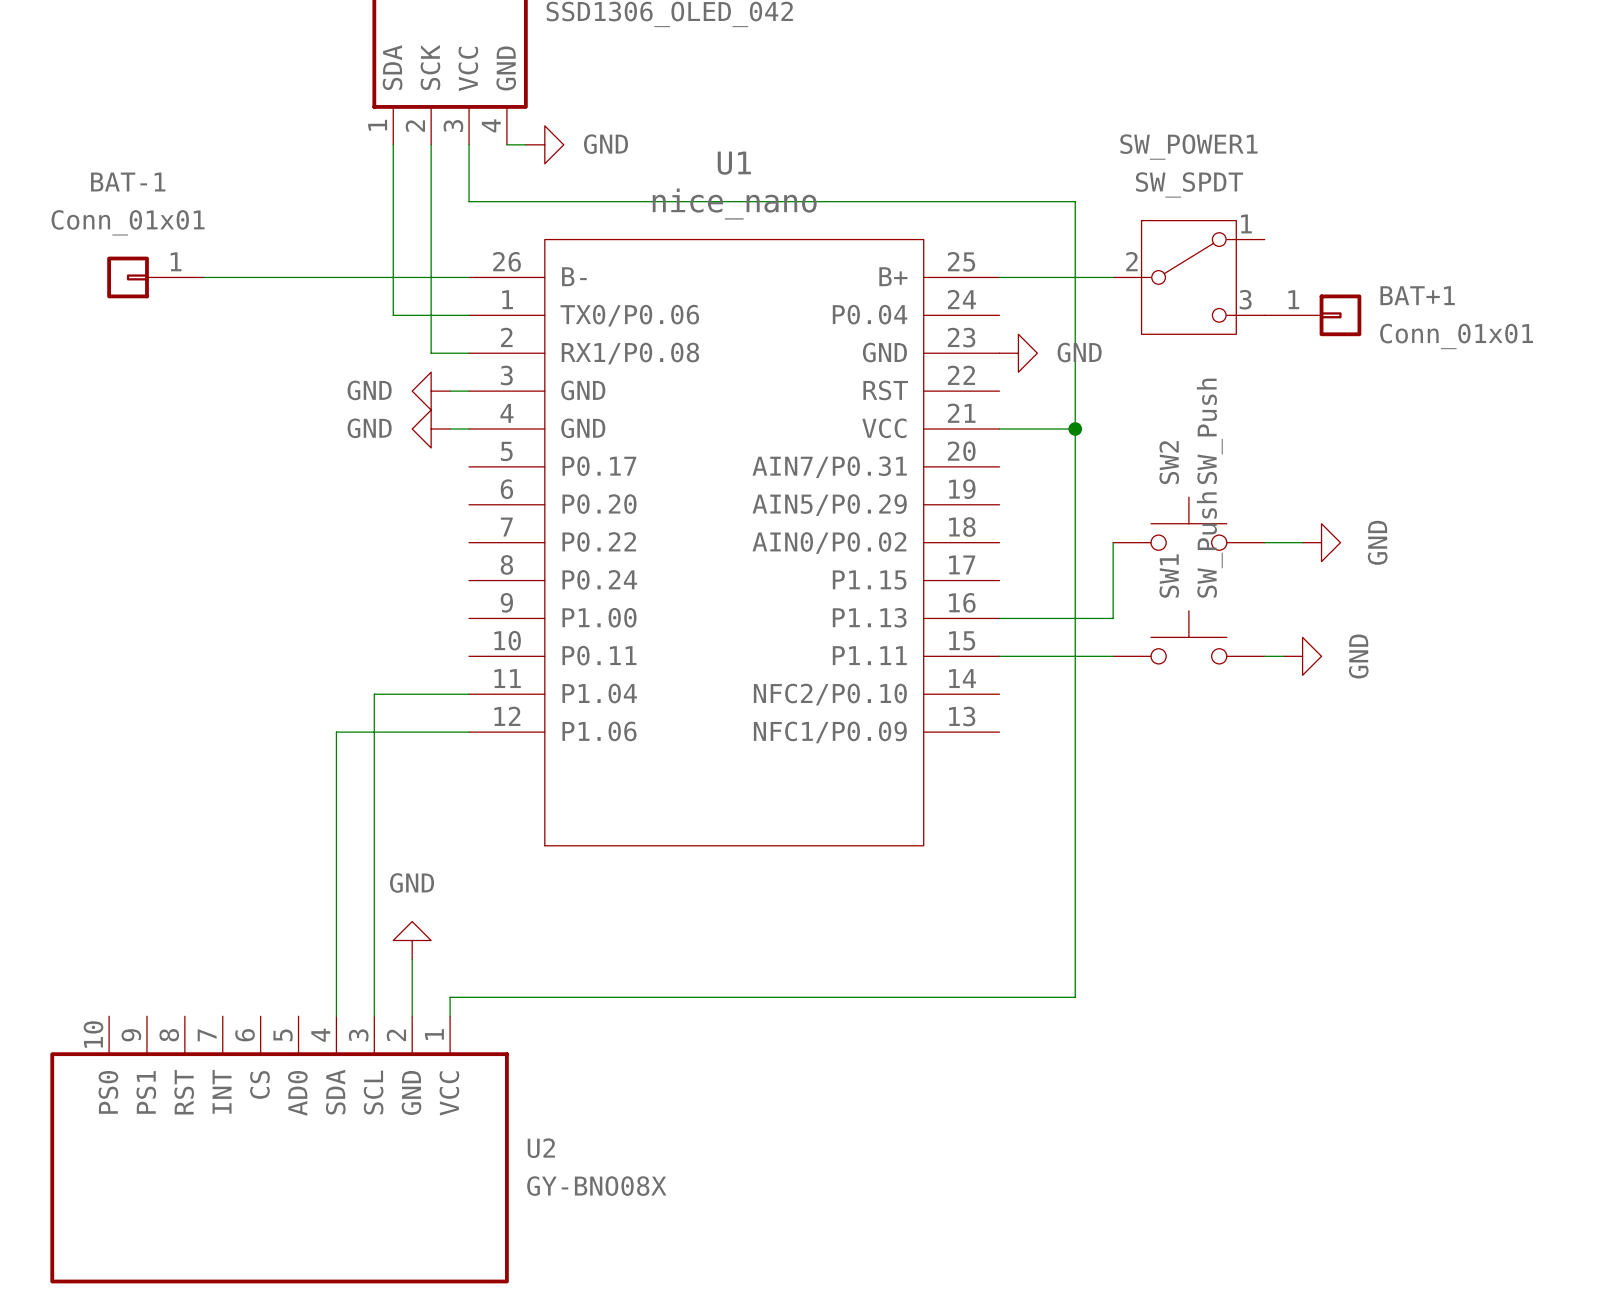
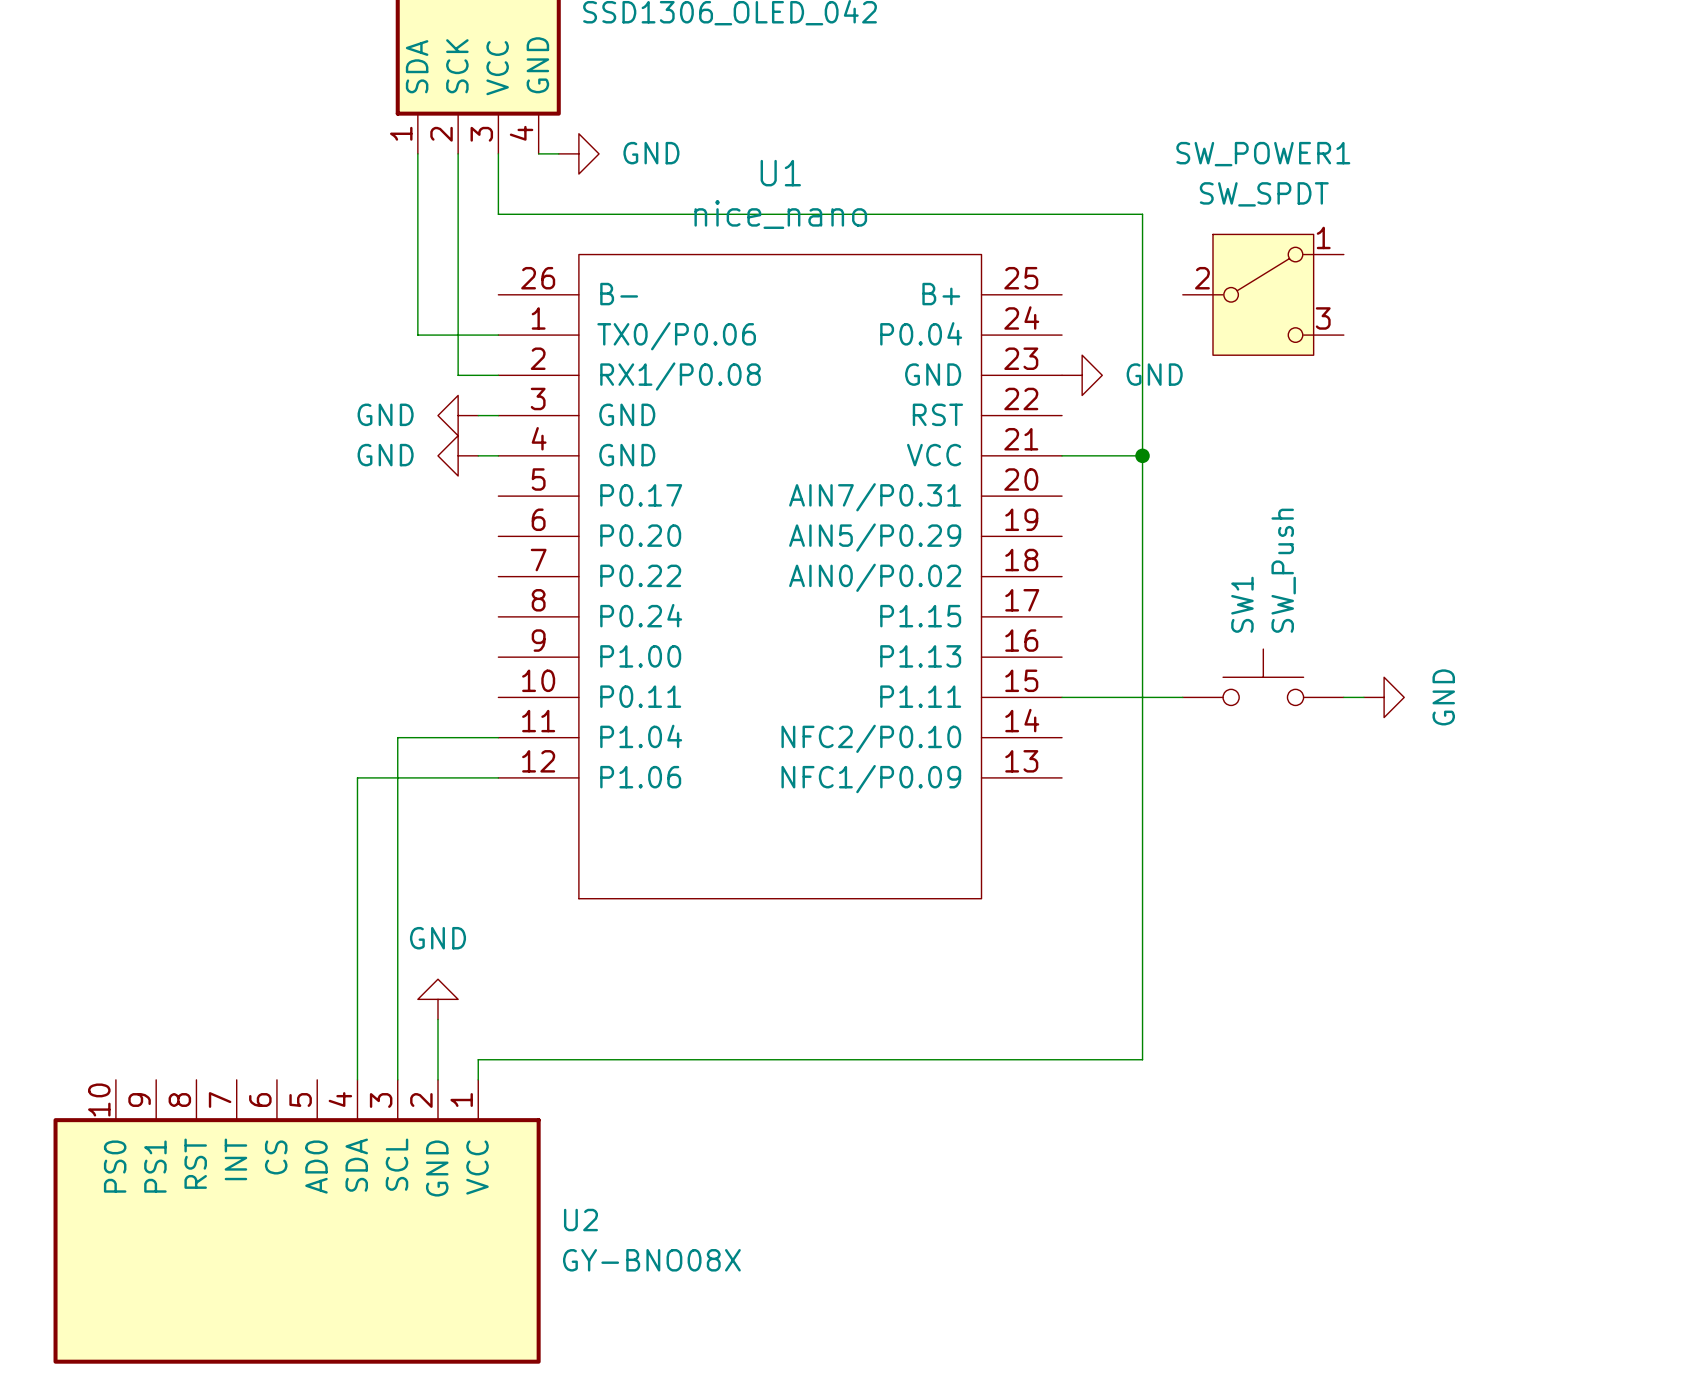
BAT-1: Conn_01x01 (155, 277) -> none
wire: (203, 277) (469, 277) -> none
wire: (999, 277) (1113, 277) -> none
BAT+1: Conn_01x01 (1313, 315) -> none
SW2: SW_Push (1188, 523) -> none
wire: (1113, 542) (1113, 618) (999, 618) -> none
wire: (1264, 542) (1302, 542) -> none
power symbol: GND (1321, 542) -> none

